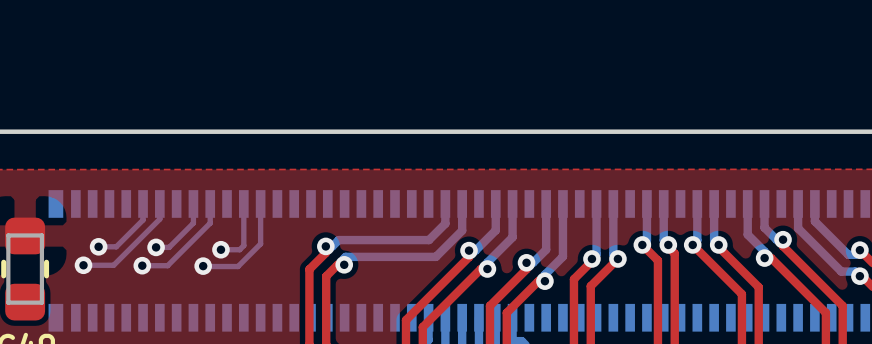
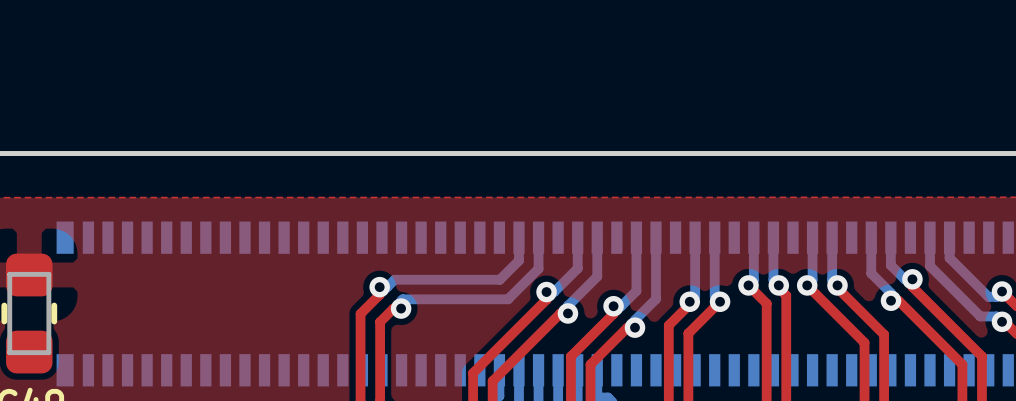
bottom track: (143, 203) (143, 220) (116, 246) (98, 246) -> none
bottom track: (159, 203) (159, 219) (113, 265) (83, 265) -> none
bottom track: (193, 203) (193, 223) (169, 247) (156, 247) -> none
bottom track: (210, 203) (210, 223) (167, 265) (142, 265) -> none
bottom track: (243, 203) (243, 245) (239, 249) (220, 249) -> none
bottom track: (260, 203) (260, 243) (238, 266) (203, 266) -> none
via: (98, 246) -> none
via: (156, 247) -> none
via: (220, 249) -> none
via: (83, 265) -> none
via: (142, 265) -> none
via: (203, 266) -> none

